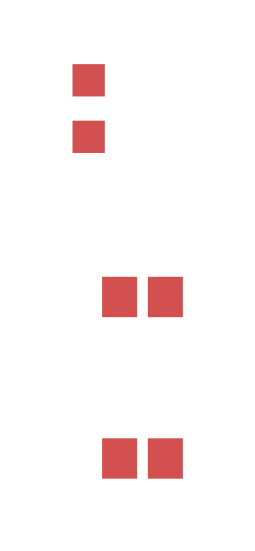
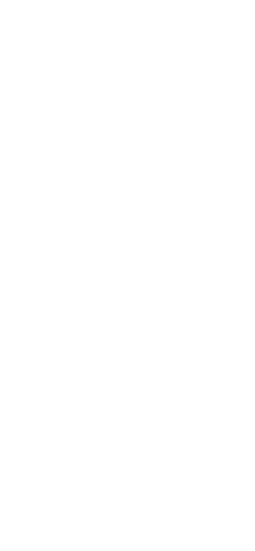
part: (88, 108) -> none
part: (142, 296) -> none
part: (142, 458) -> none

